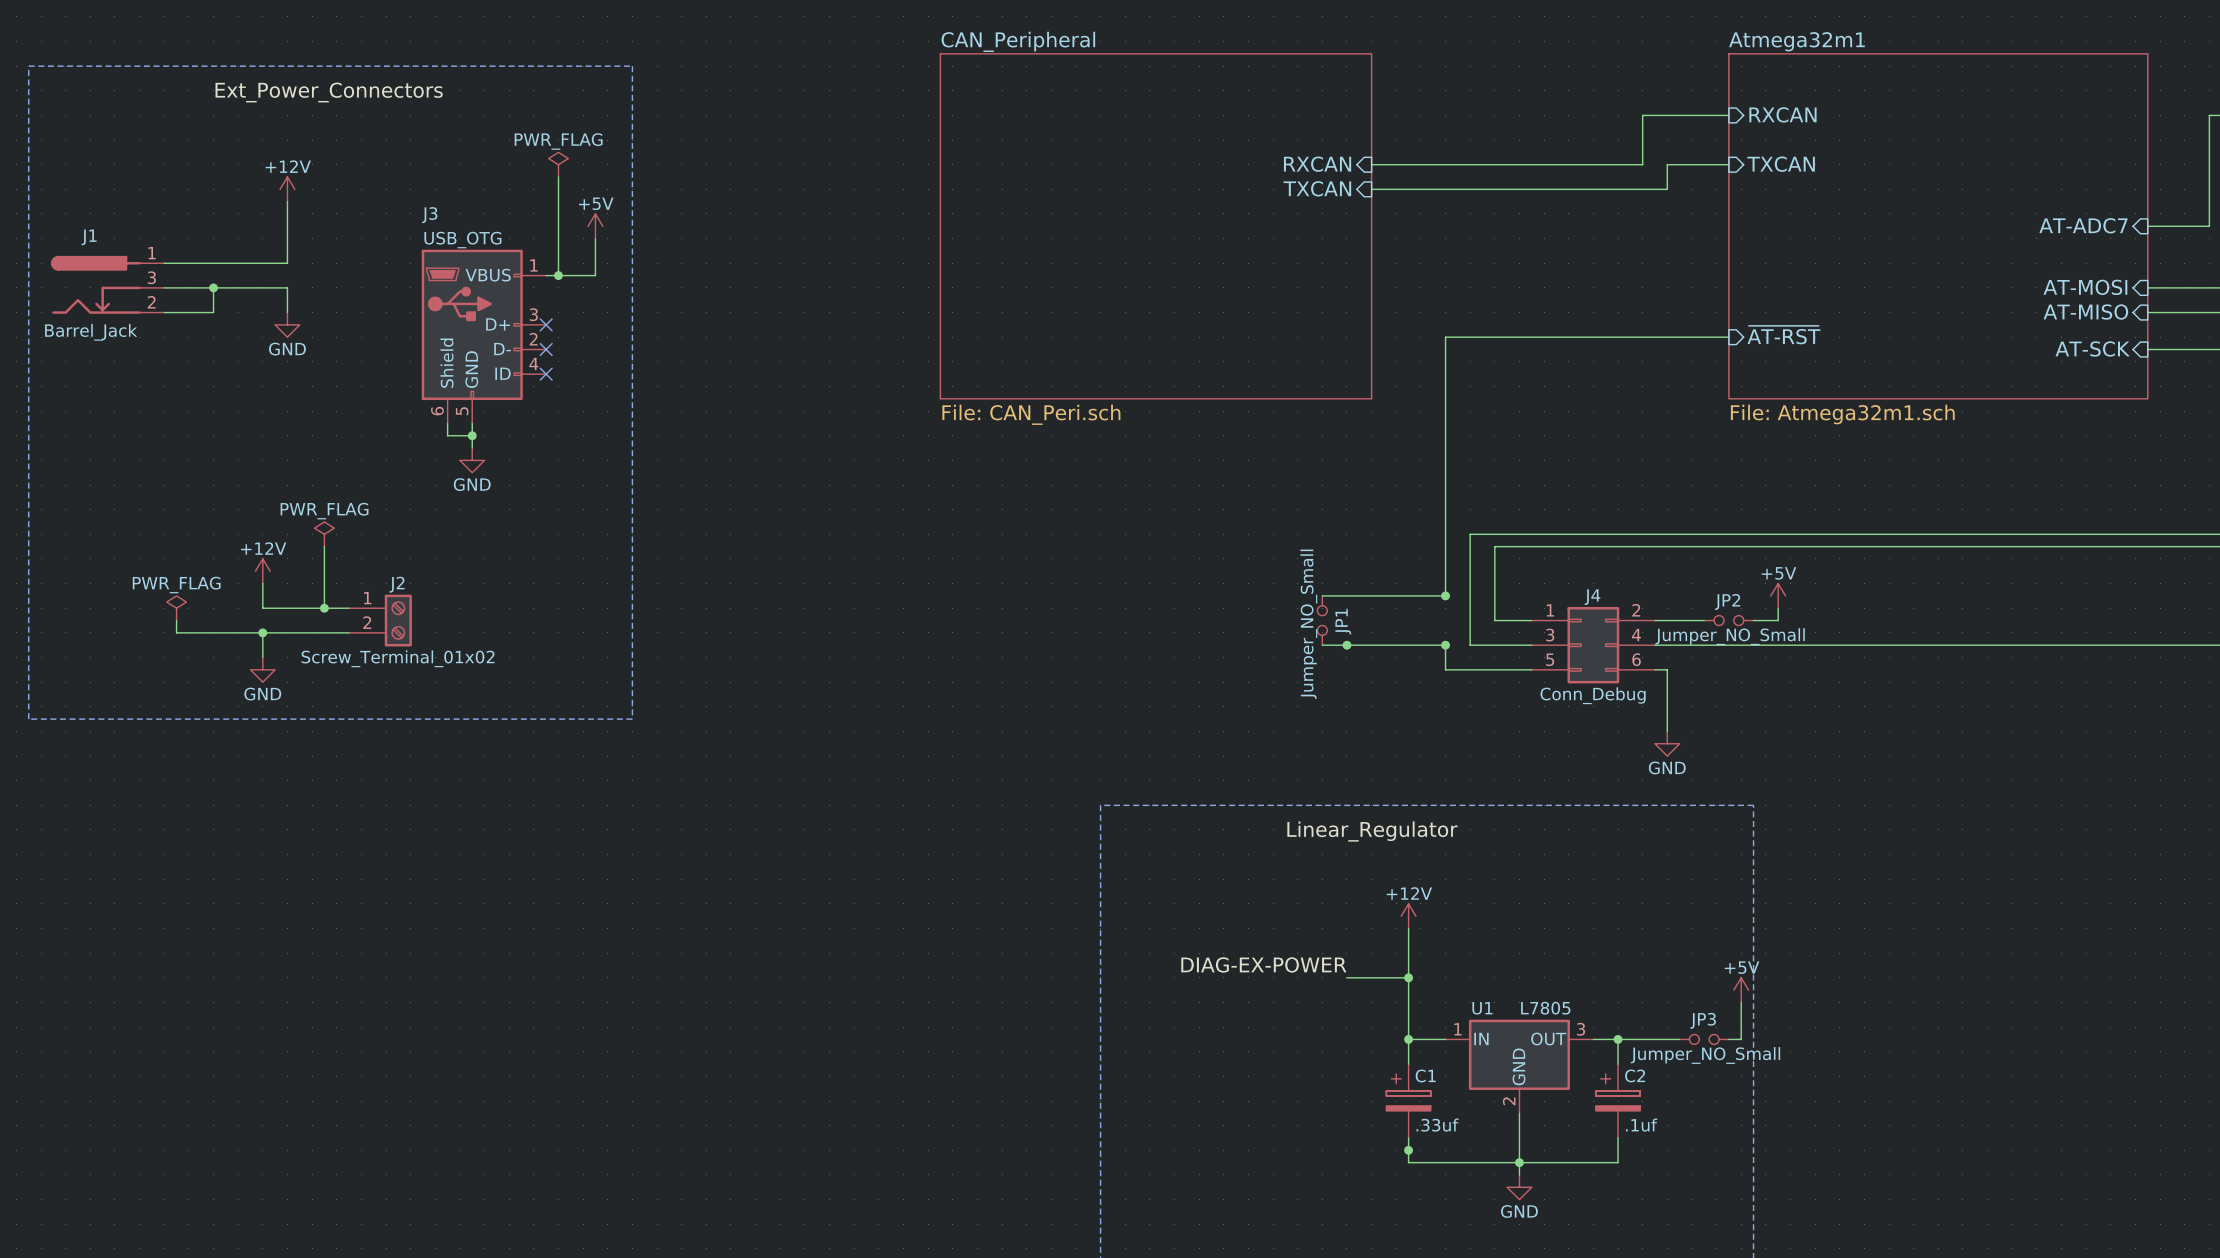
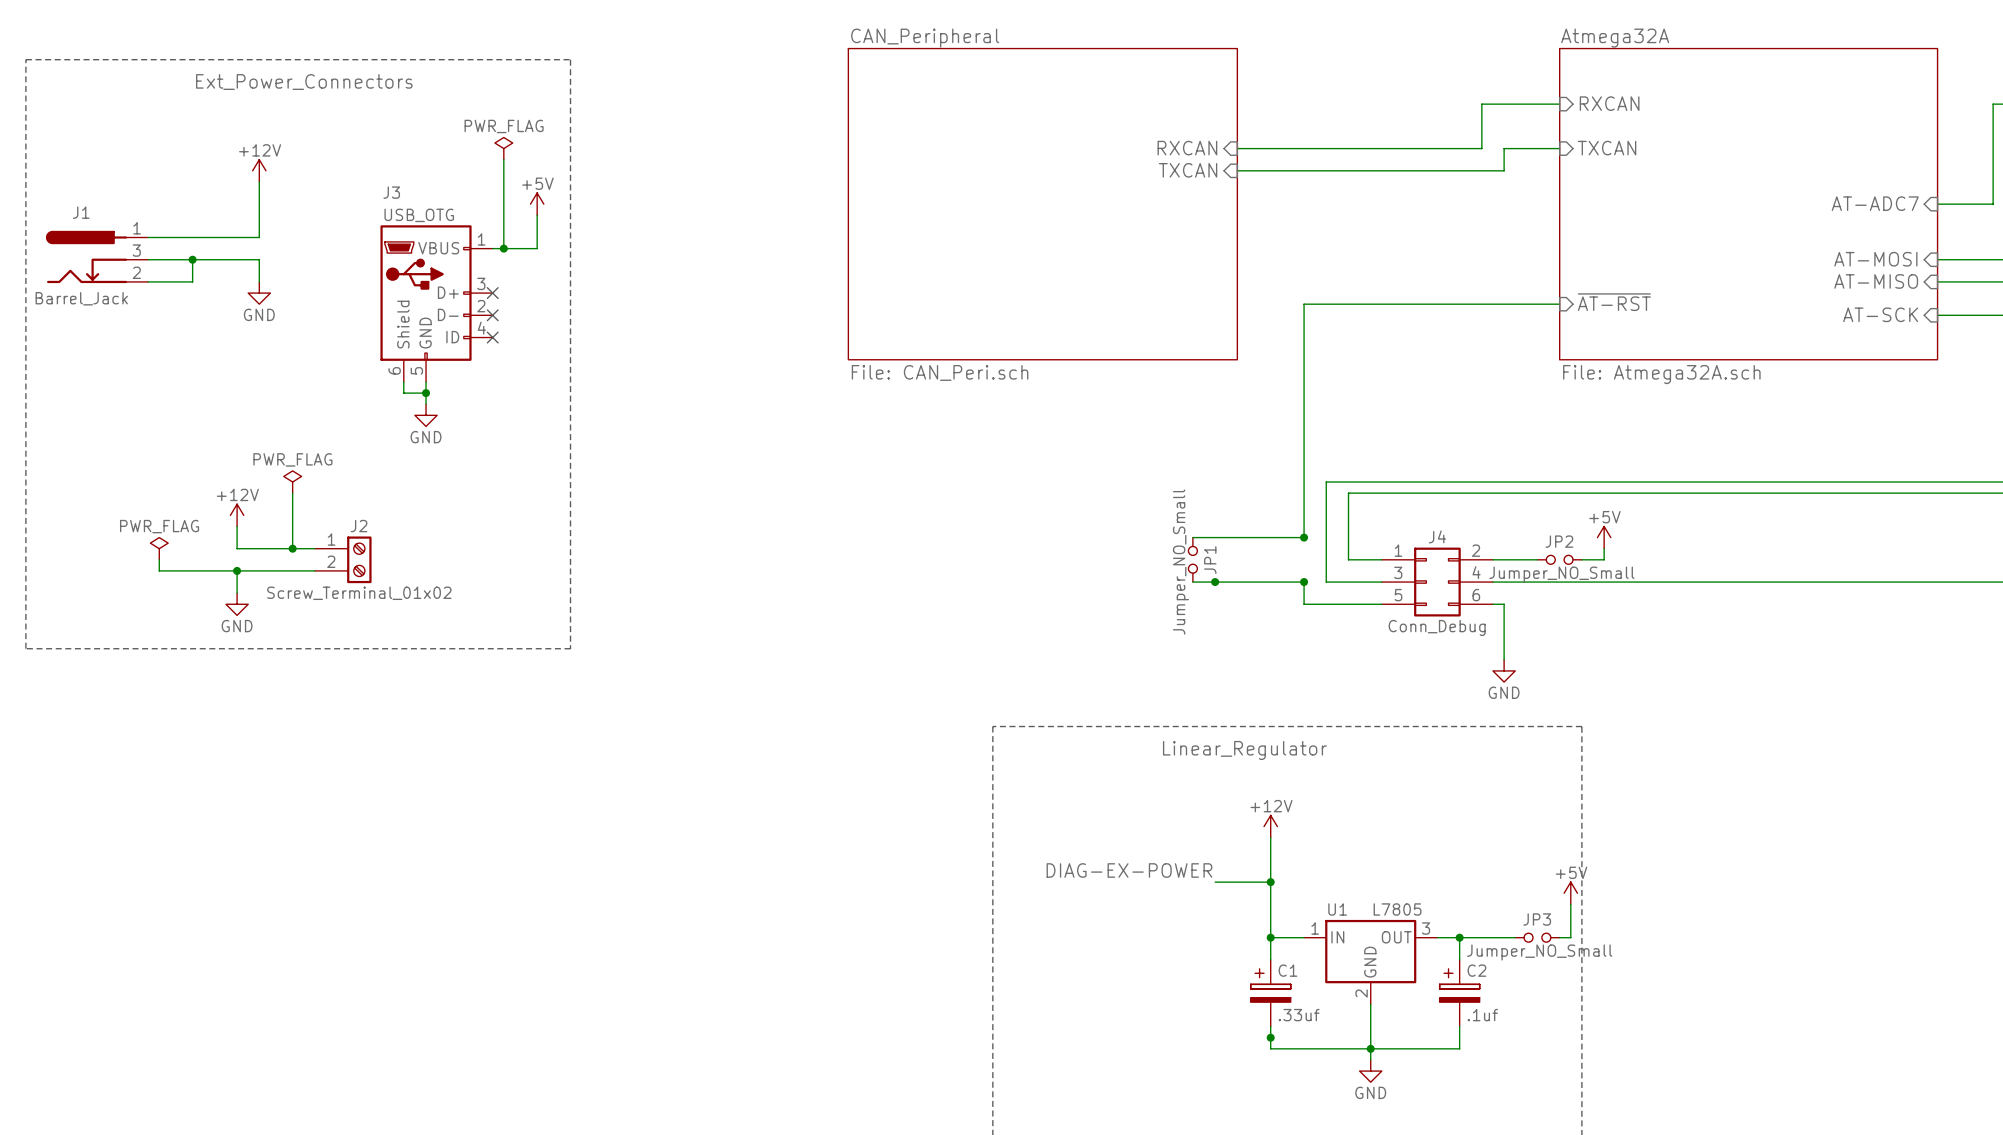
sheet Atmega32m1 name: Atmega32m1 (1796, 41) -> Atmega32A (1615, 38)
sheet Atmega32m1 value: File: Atmega32m1.sch (1842, 414) -> File: Atmega32A.sch (1661, 374)

